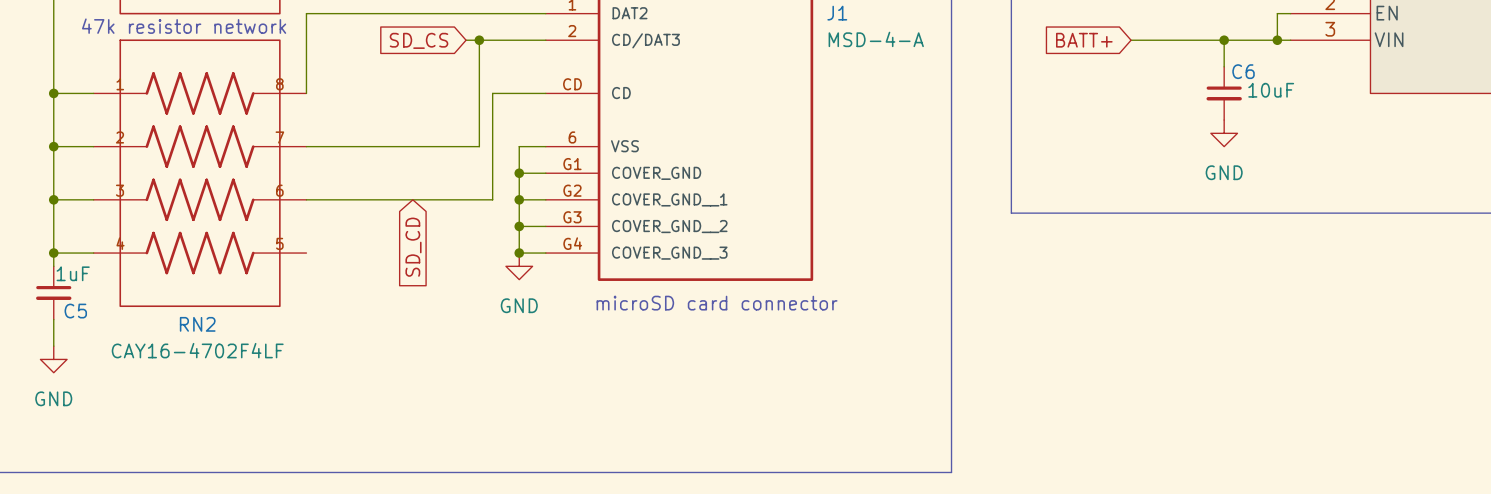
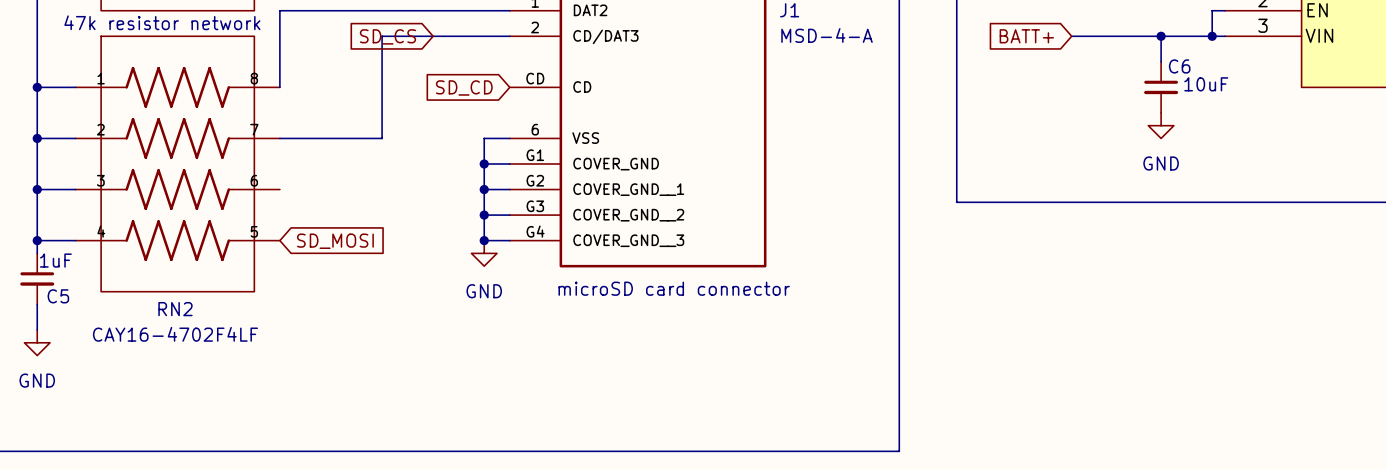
wire: (479, 40) (479, 146) (412, 146) -> (433, 36) (382, 36) (382, 138)
junction: (479, 40) -> none
wire: (545, 93) (492, 93) (492, 199) (306, 199) -> none
global label rotation: 0° (413, 247) -> 90° clockwise (464, 87)
global label position: SD_CD (413, 247) -> SD_CD (464, 87)
global label: none -> SD_MOSI (335, 241)

